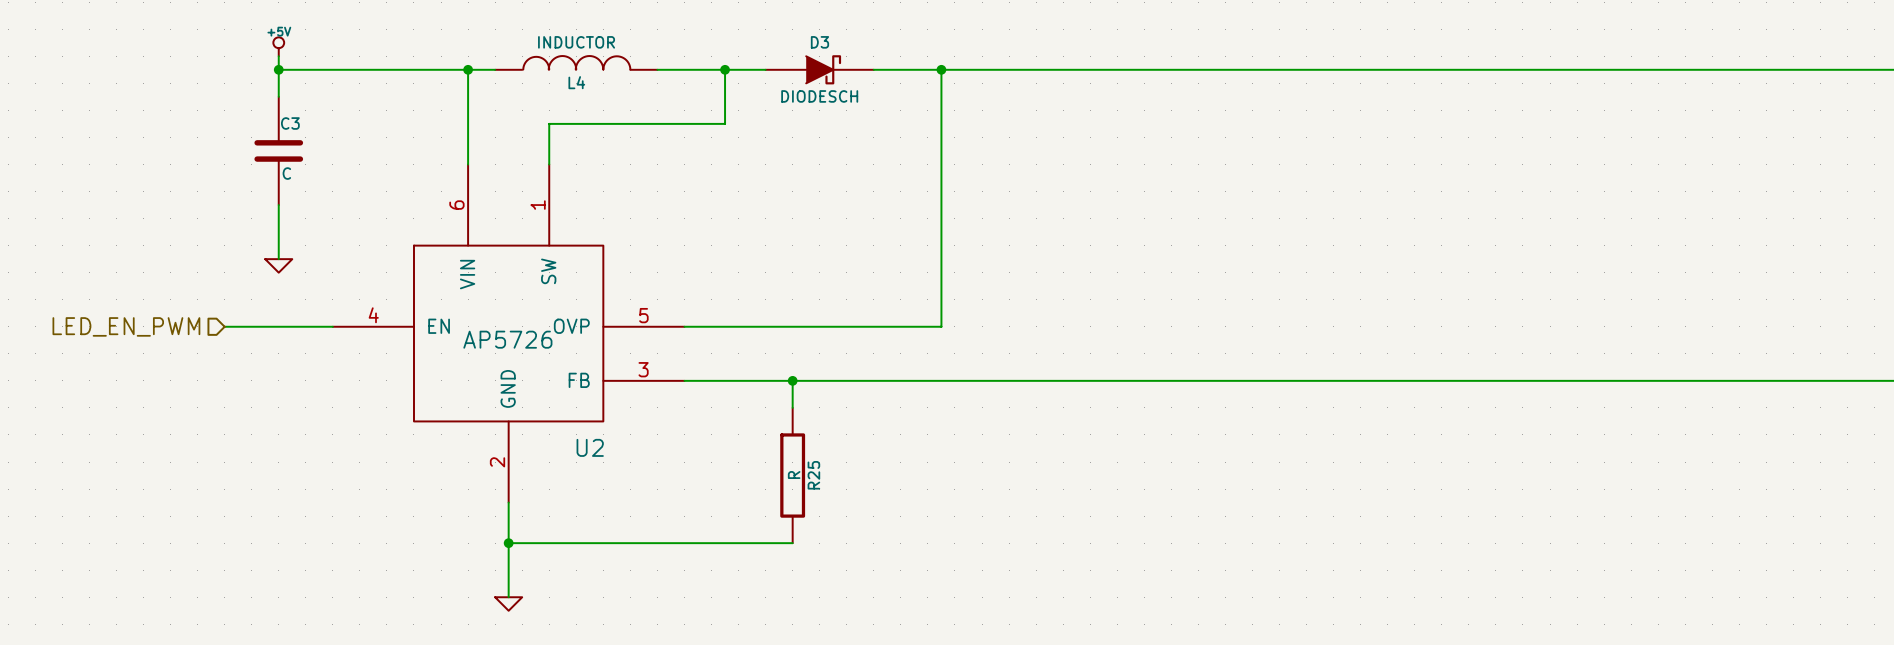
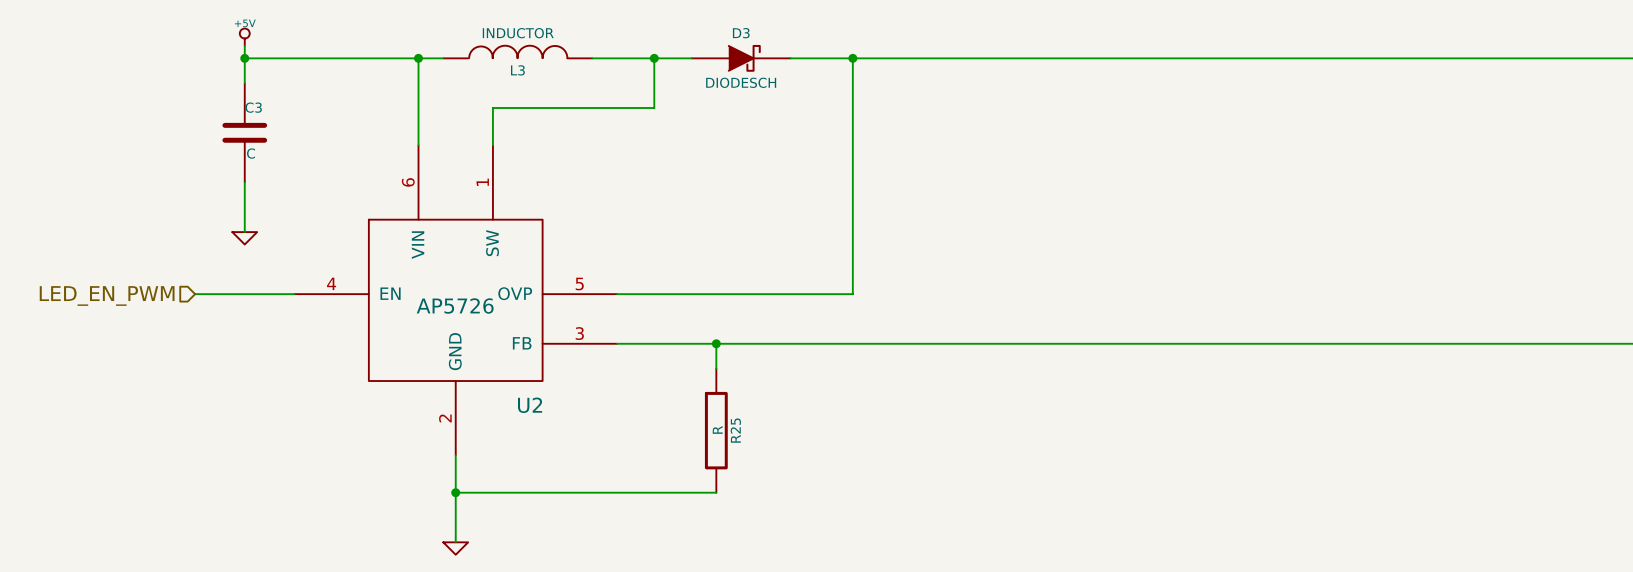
L4 name: L4 (576, 82) -> L3 (517, 70)

